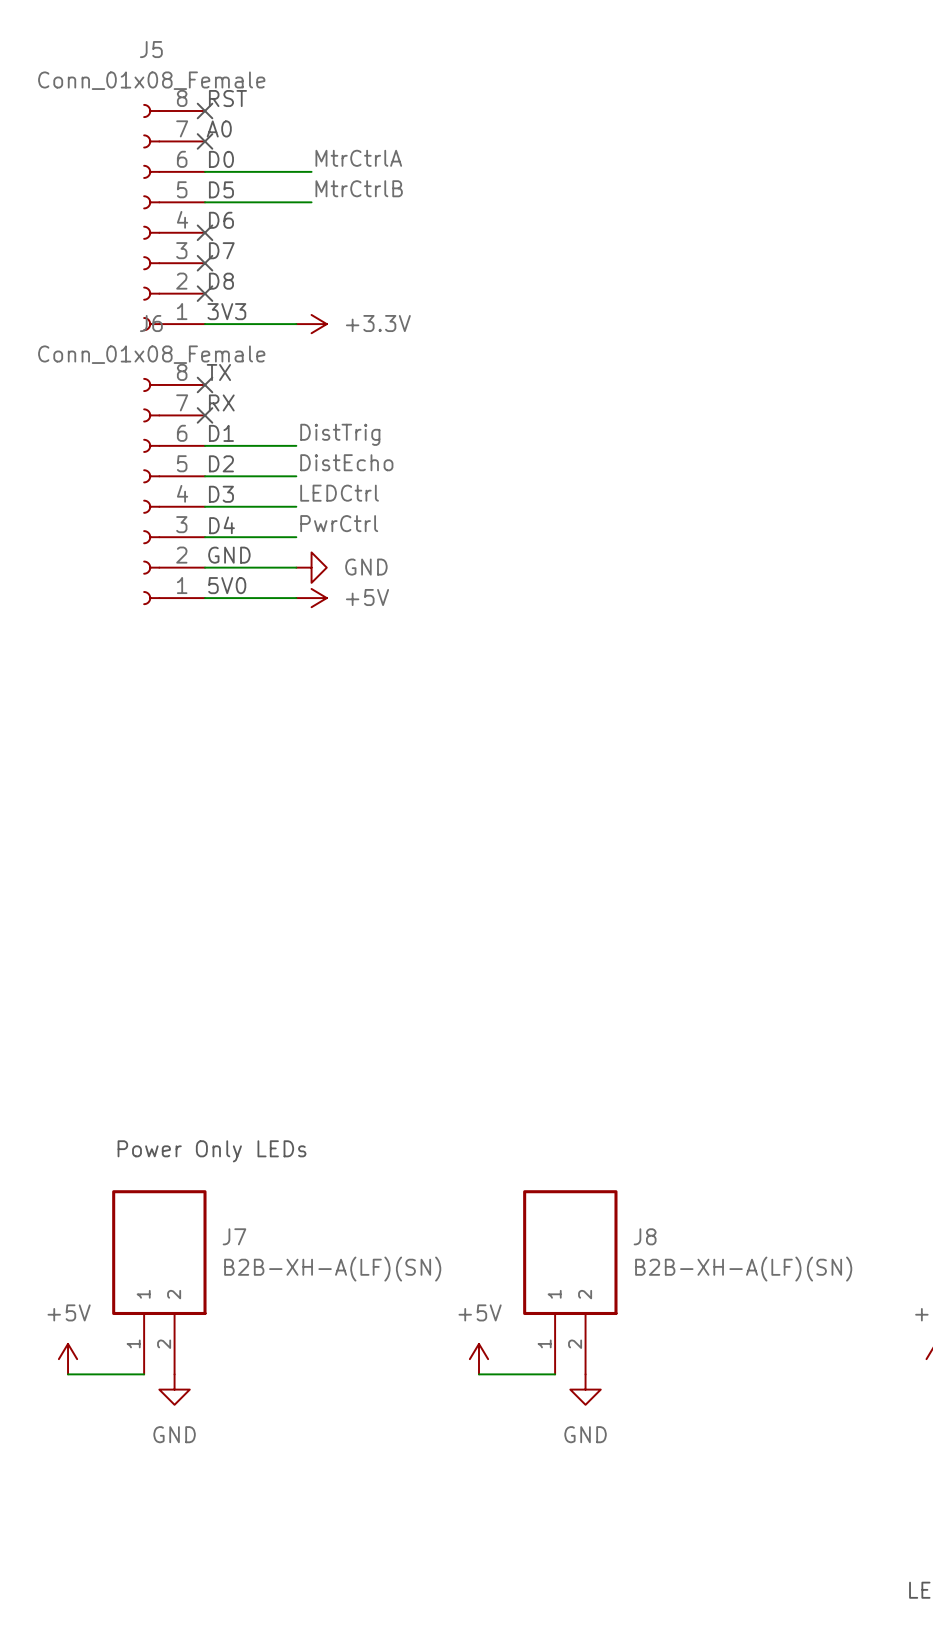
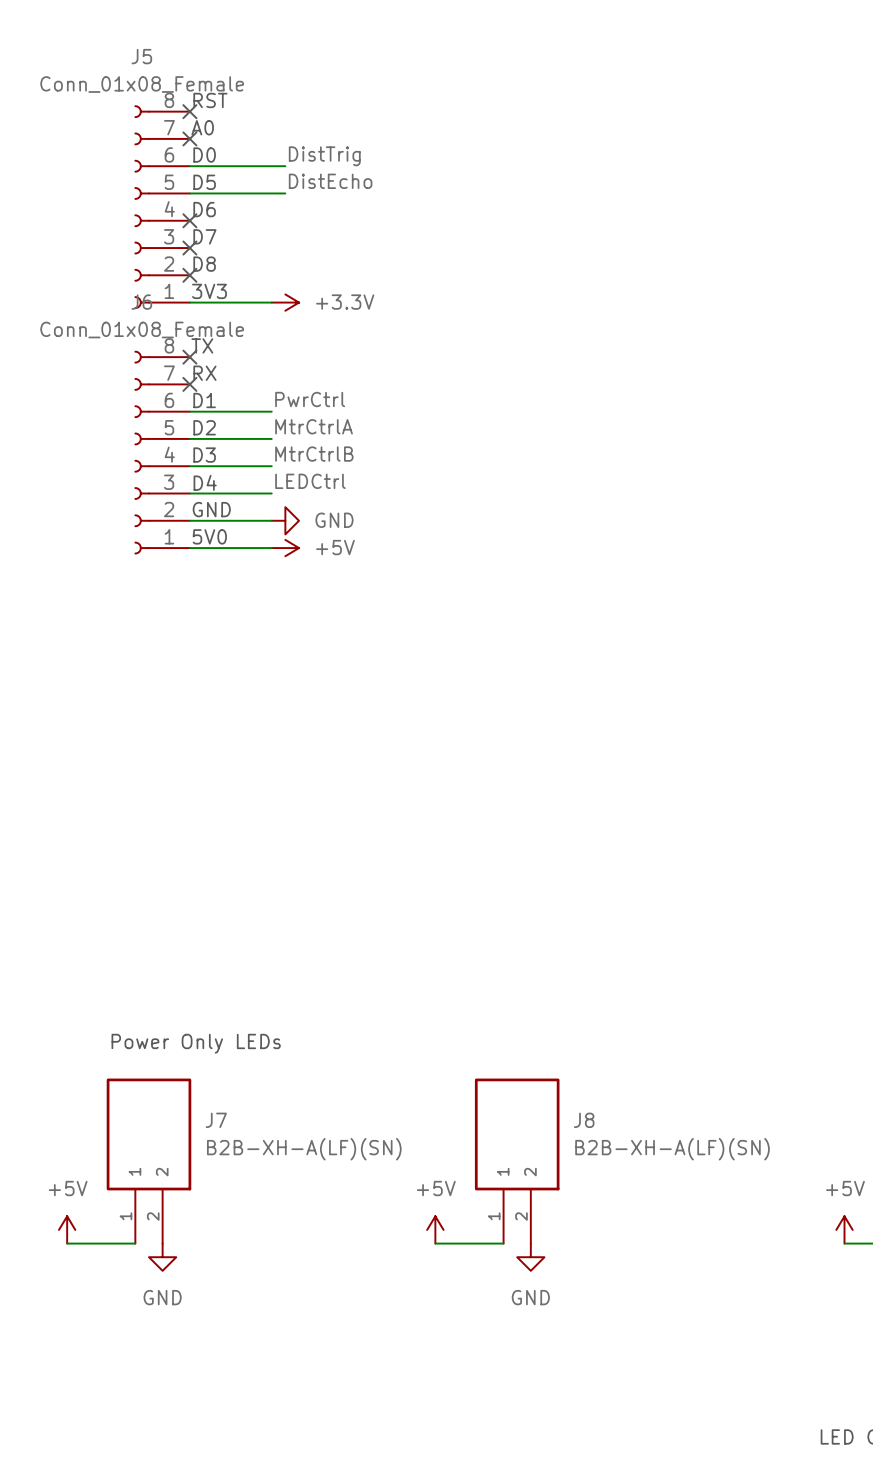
label: MtrCtrlA (358, 158) -> DistTrig (324, 156)
label: MtrCtrlB (359, 188) -> DistEcho (330, 181)
label: DistTrig (340, 434) -> PwrCtrl (310, 399)
label: DistEcho (346, 462) -> MtrCtrlA (314, 426)
label: LEDCtrl (339, 493) -> MtrCtrlB (314, 454)
label: PwrCtrl (339, 523) -> LEDCtrl (310, 481)

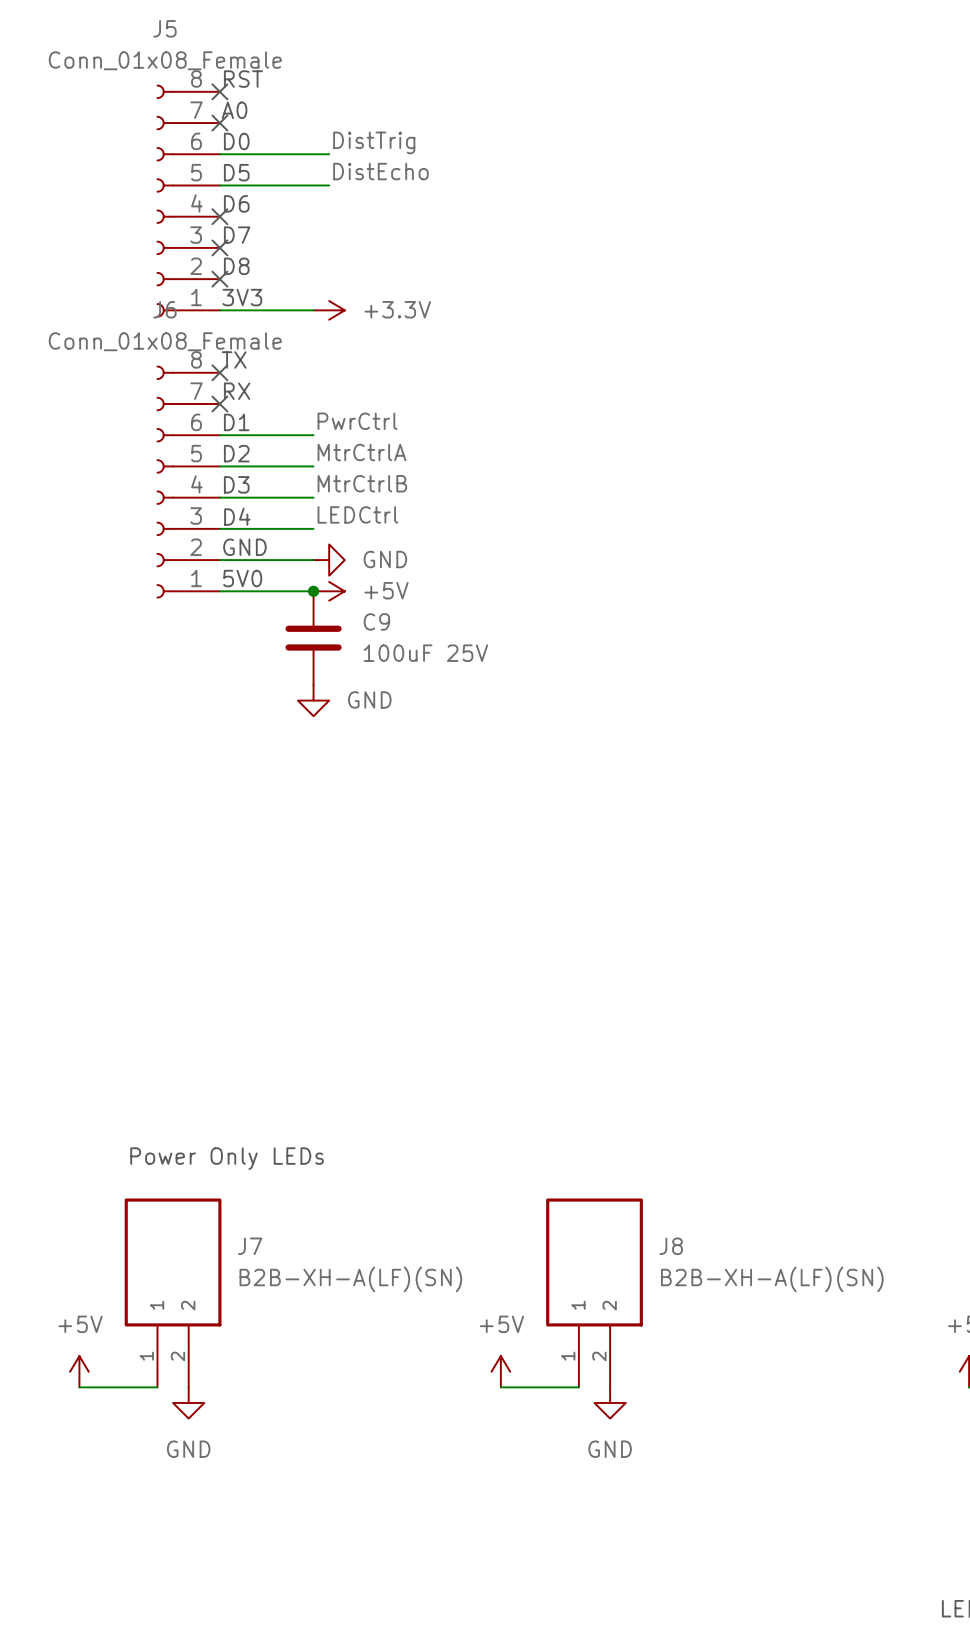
junction: none -> (313, 591)
C9: none -> 100uF 25V (313, 638)
power symbol: none -> GND (313, 700)

